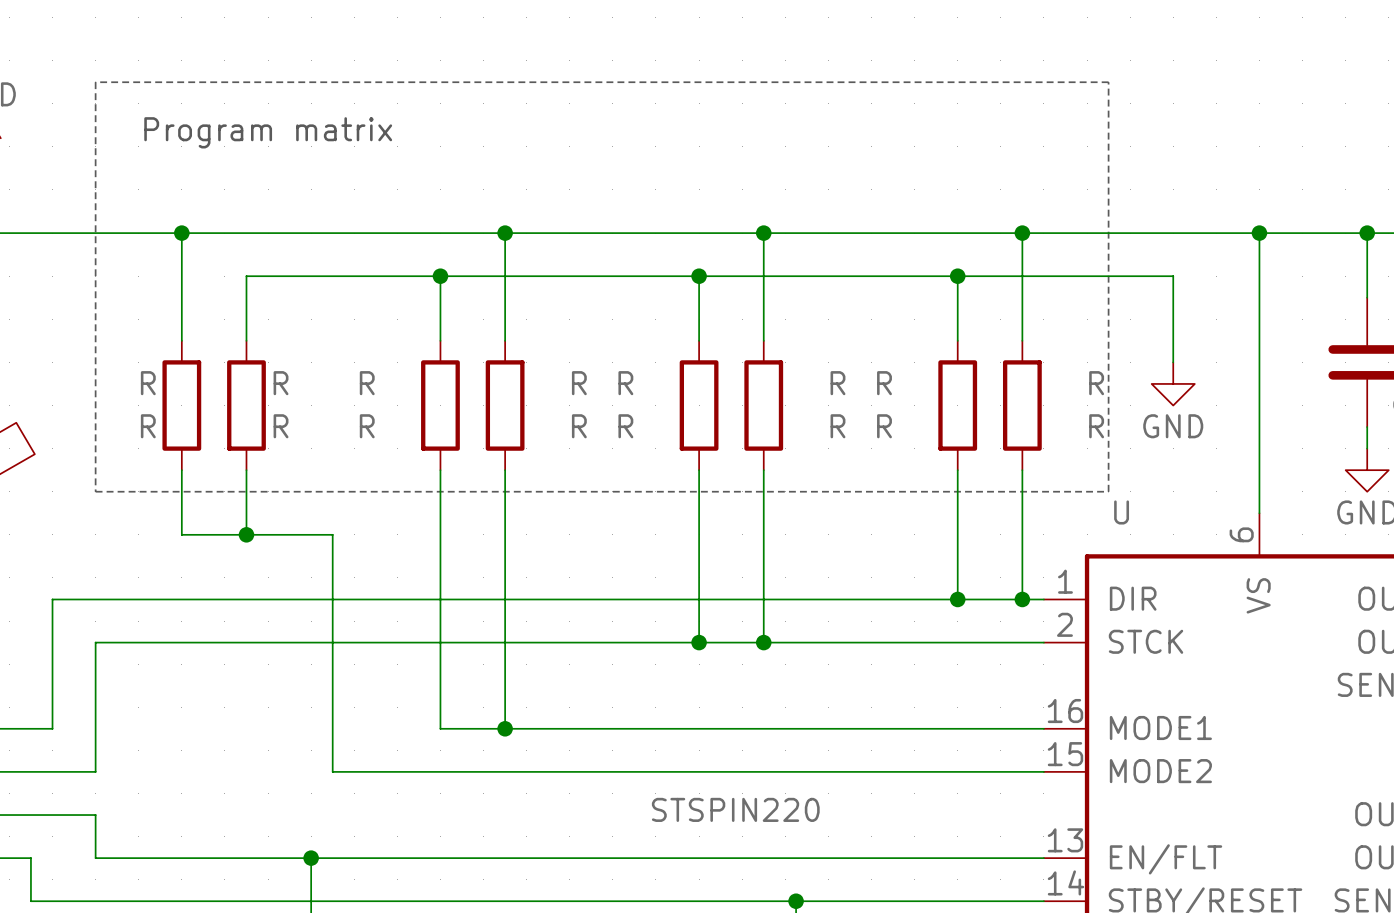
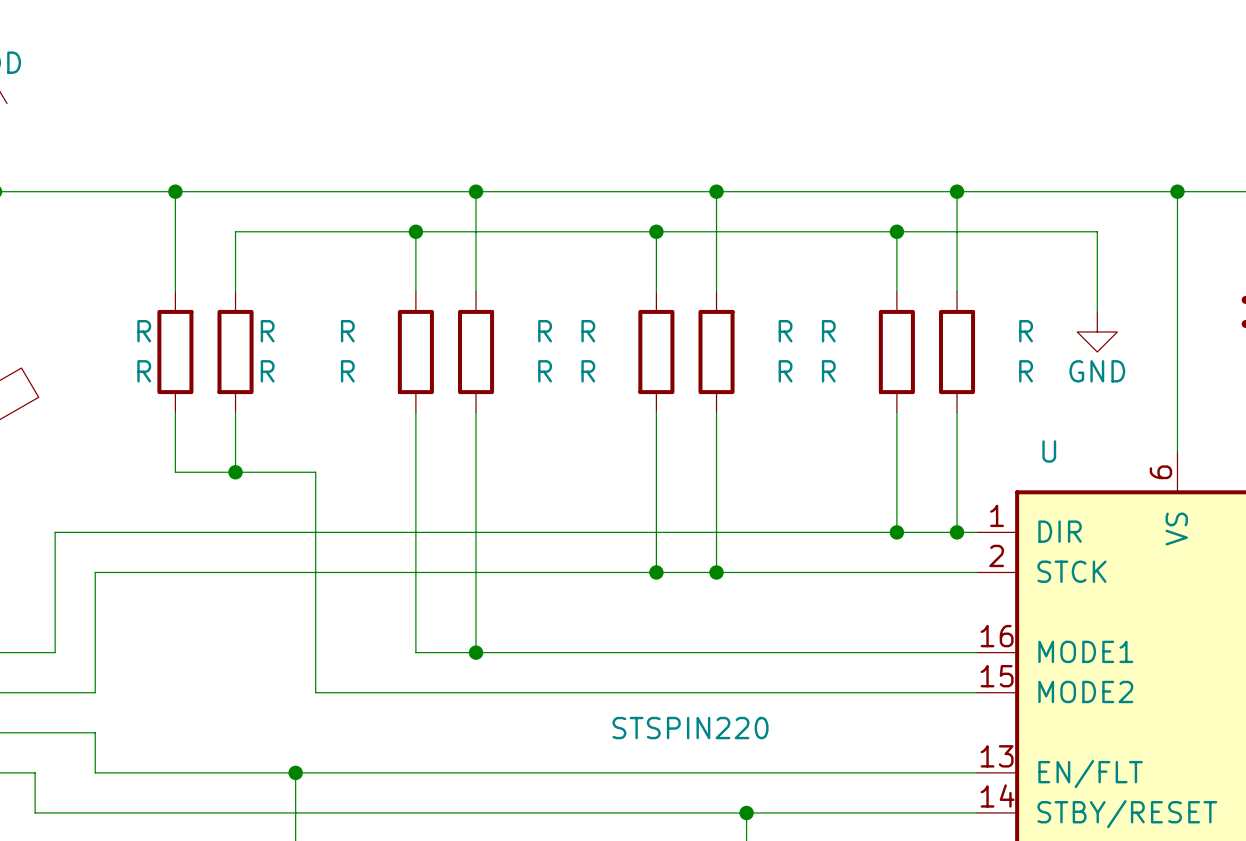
line: (95, 82) (95, 491) (1108, 491) (1108, 82) (95, 82) -> none
text: Program matrix (268, 132) -> none

